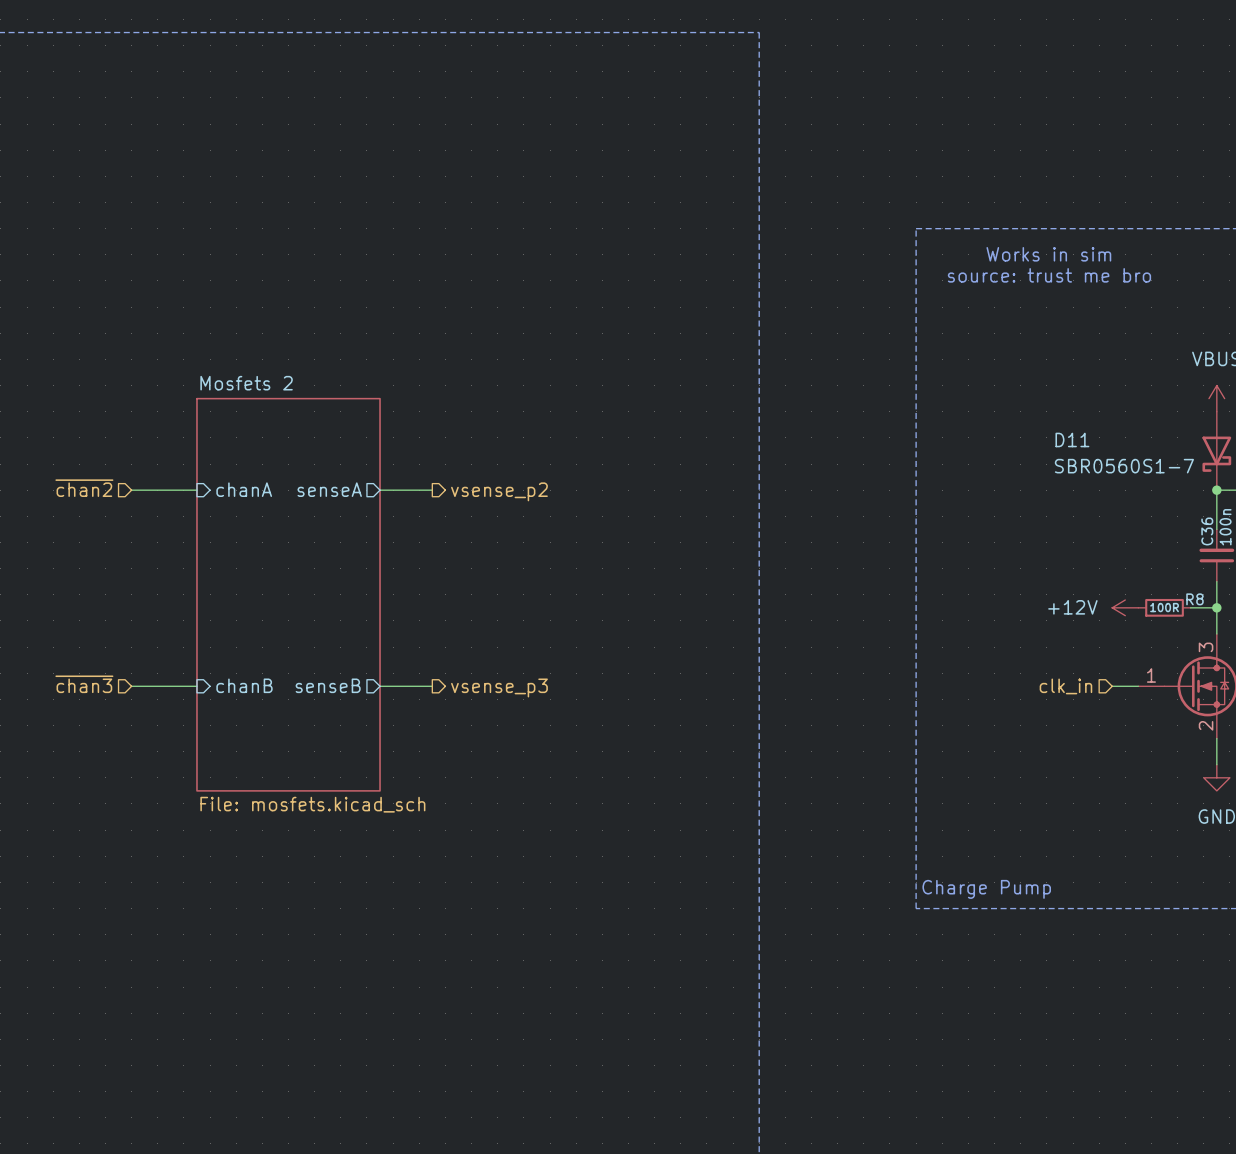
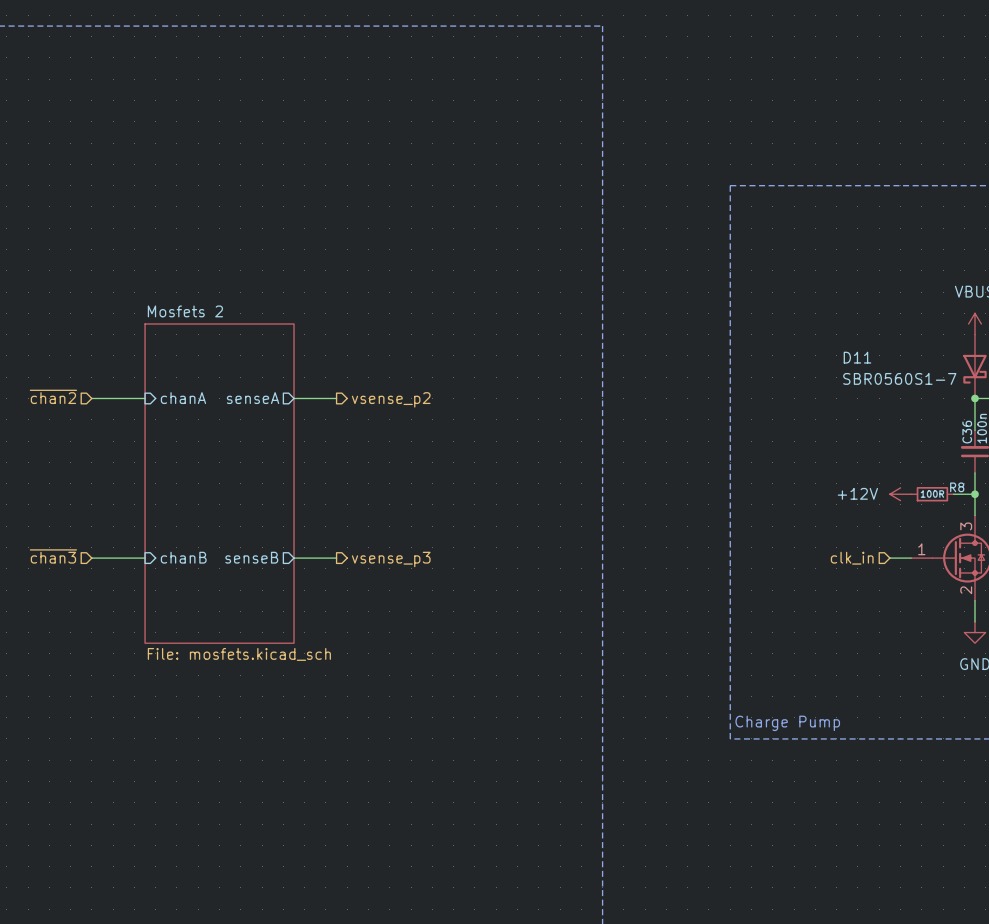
text: Works in sim (1048, 254) -> none
text: source: trust me bro (1049, 275) -> none

